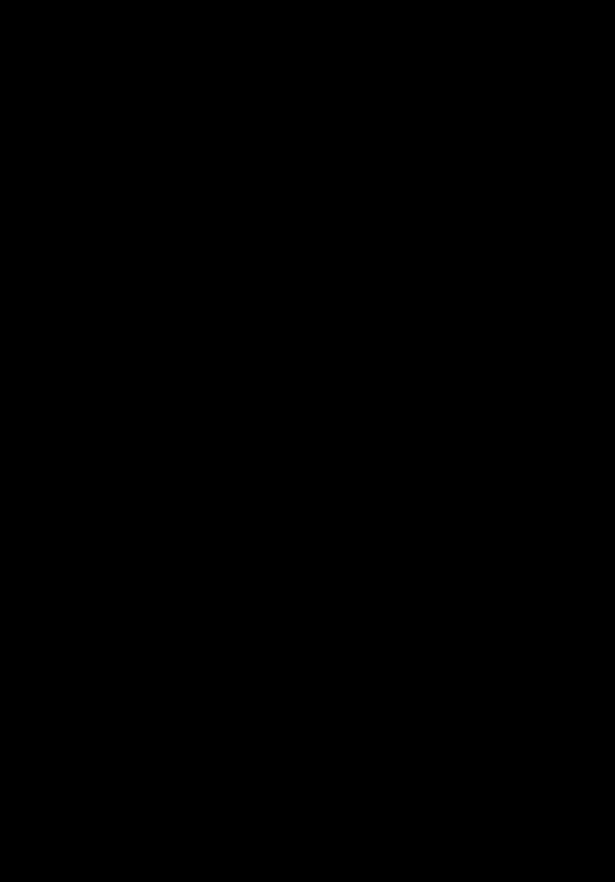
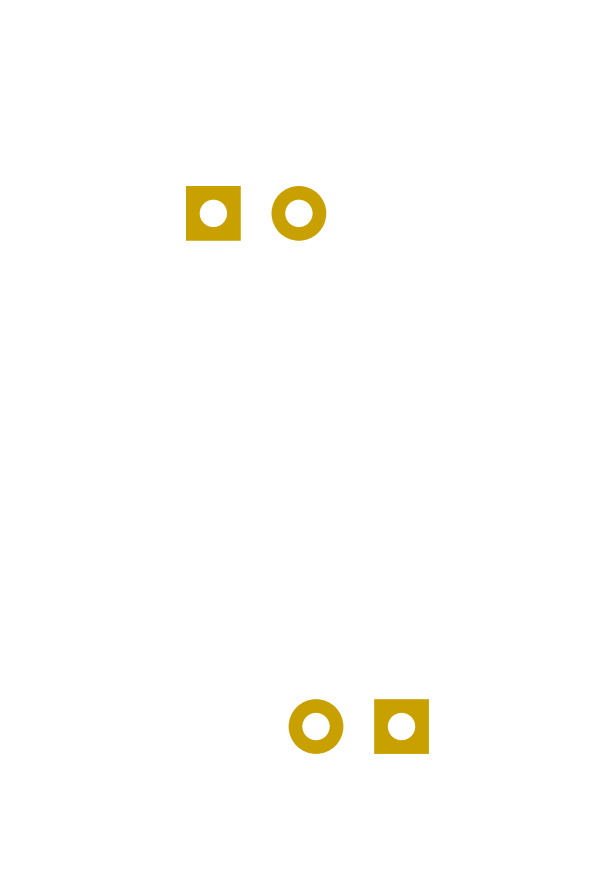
part: none -> (256, 213)
part: none -> (358, 726)

